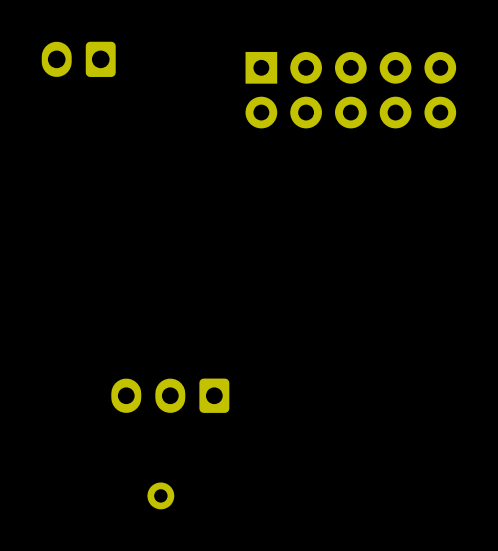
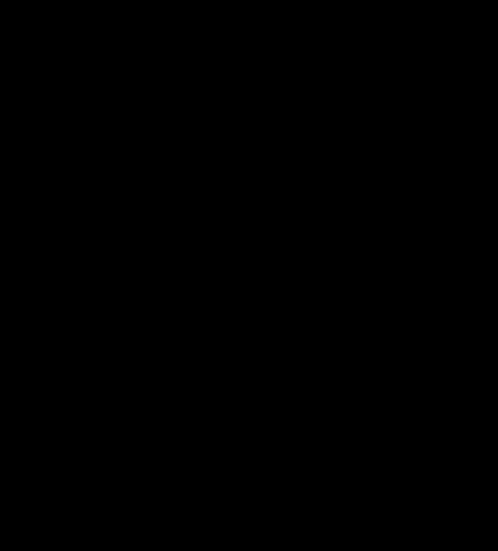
part: (78, 59) -> none
part: (350, 90) -> none
part: (170, 395) -> none
part: (160, 495) -> none

